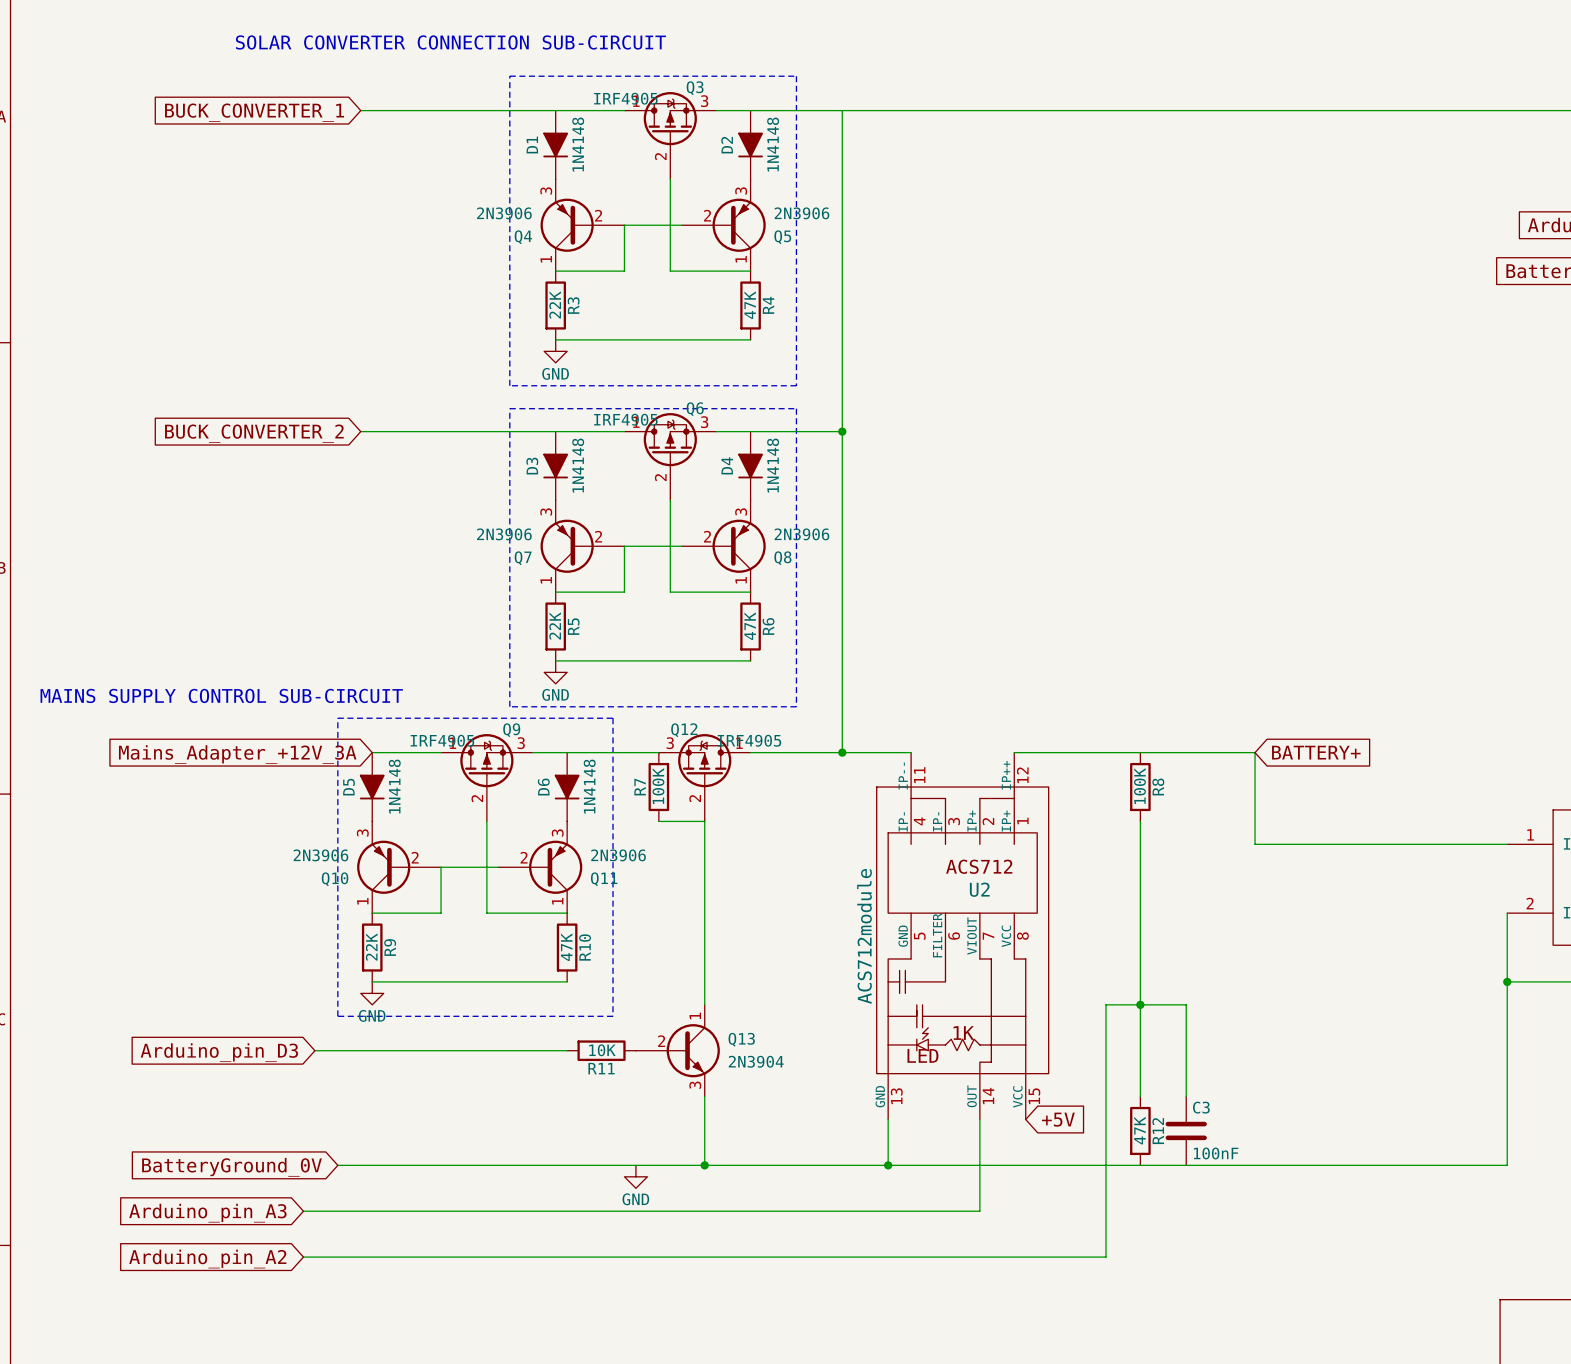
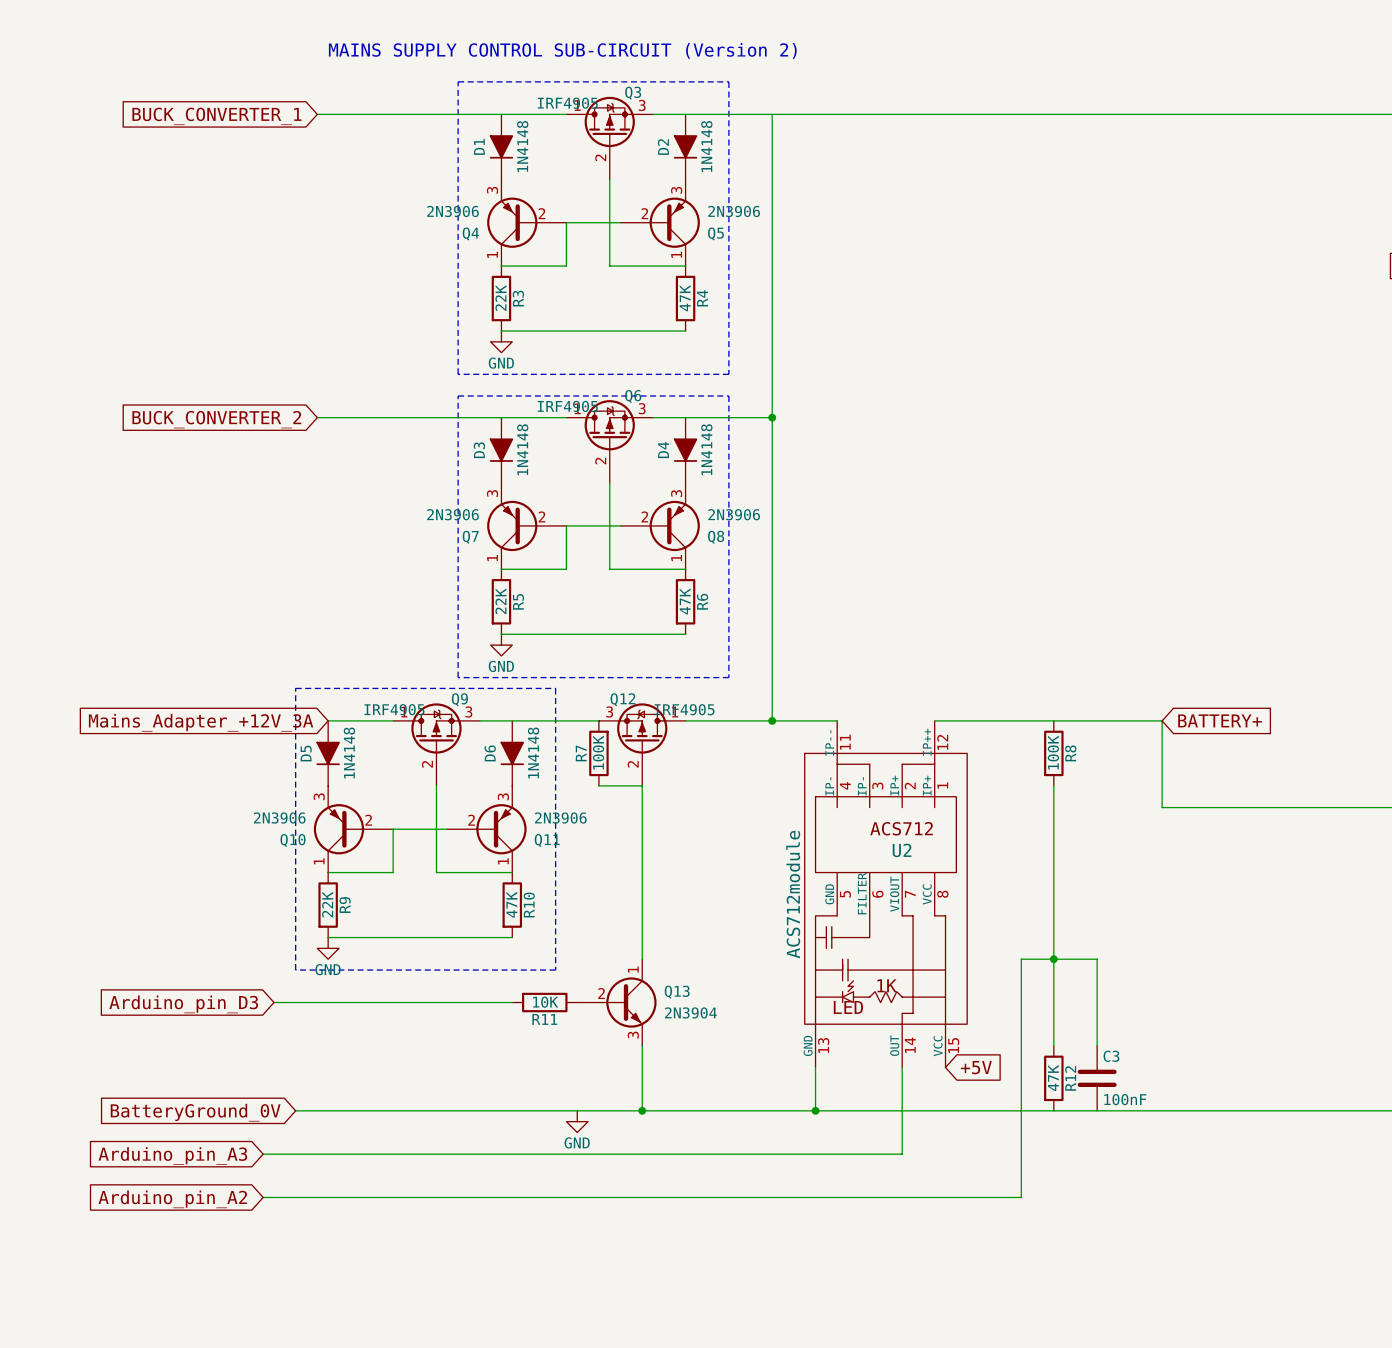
text: SOLAR CONVERTER CONNECTION SUB-CIRCUIT (450, 42) -> none
text: none -> MAINS SUPPLY CONTROL SUB-CIRCUIT (Version 2) (562, 50)
text: MAINS SUPPLY CONTROL SUB-CIRCUIT (221, 695) -> none

